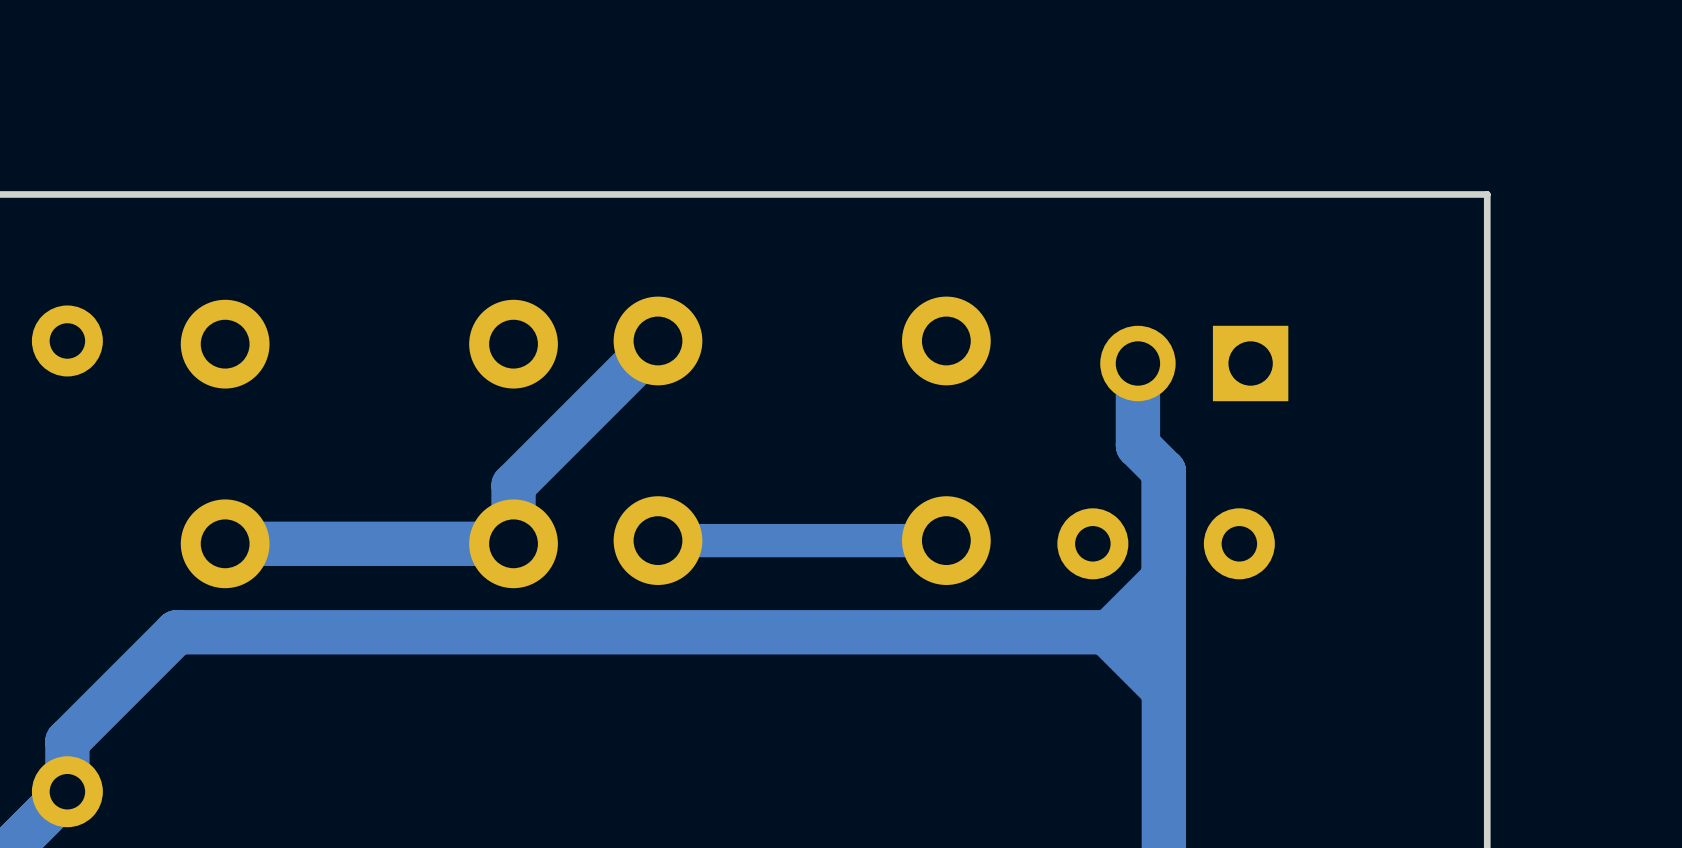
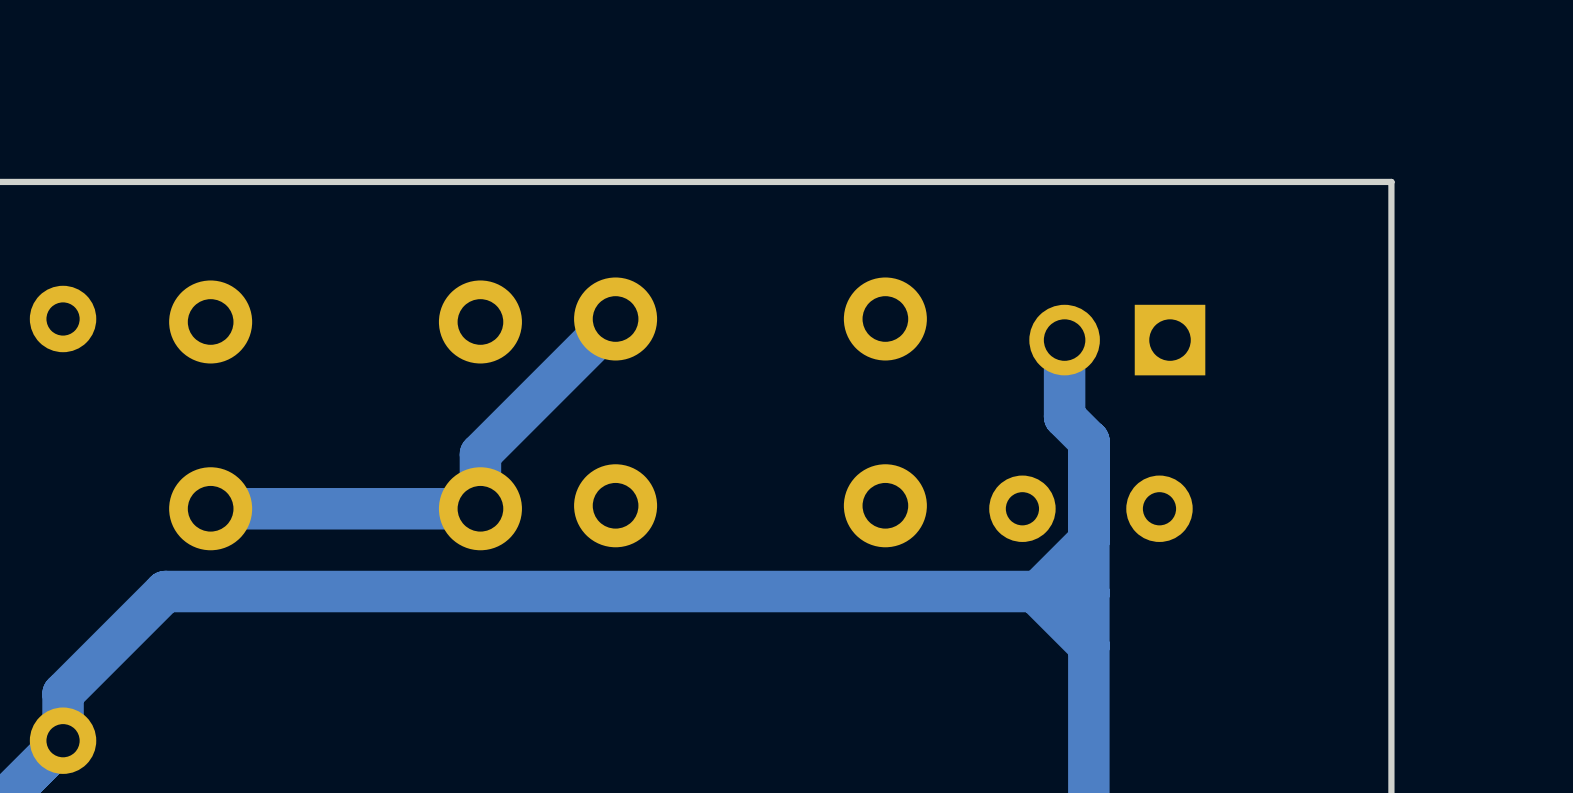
track: (946, 540) (657, 540) -> none

